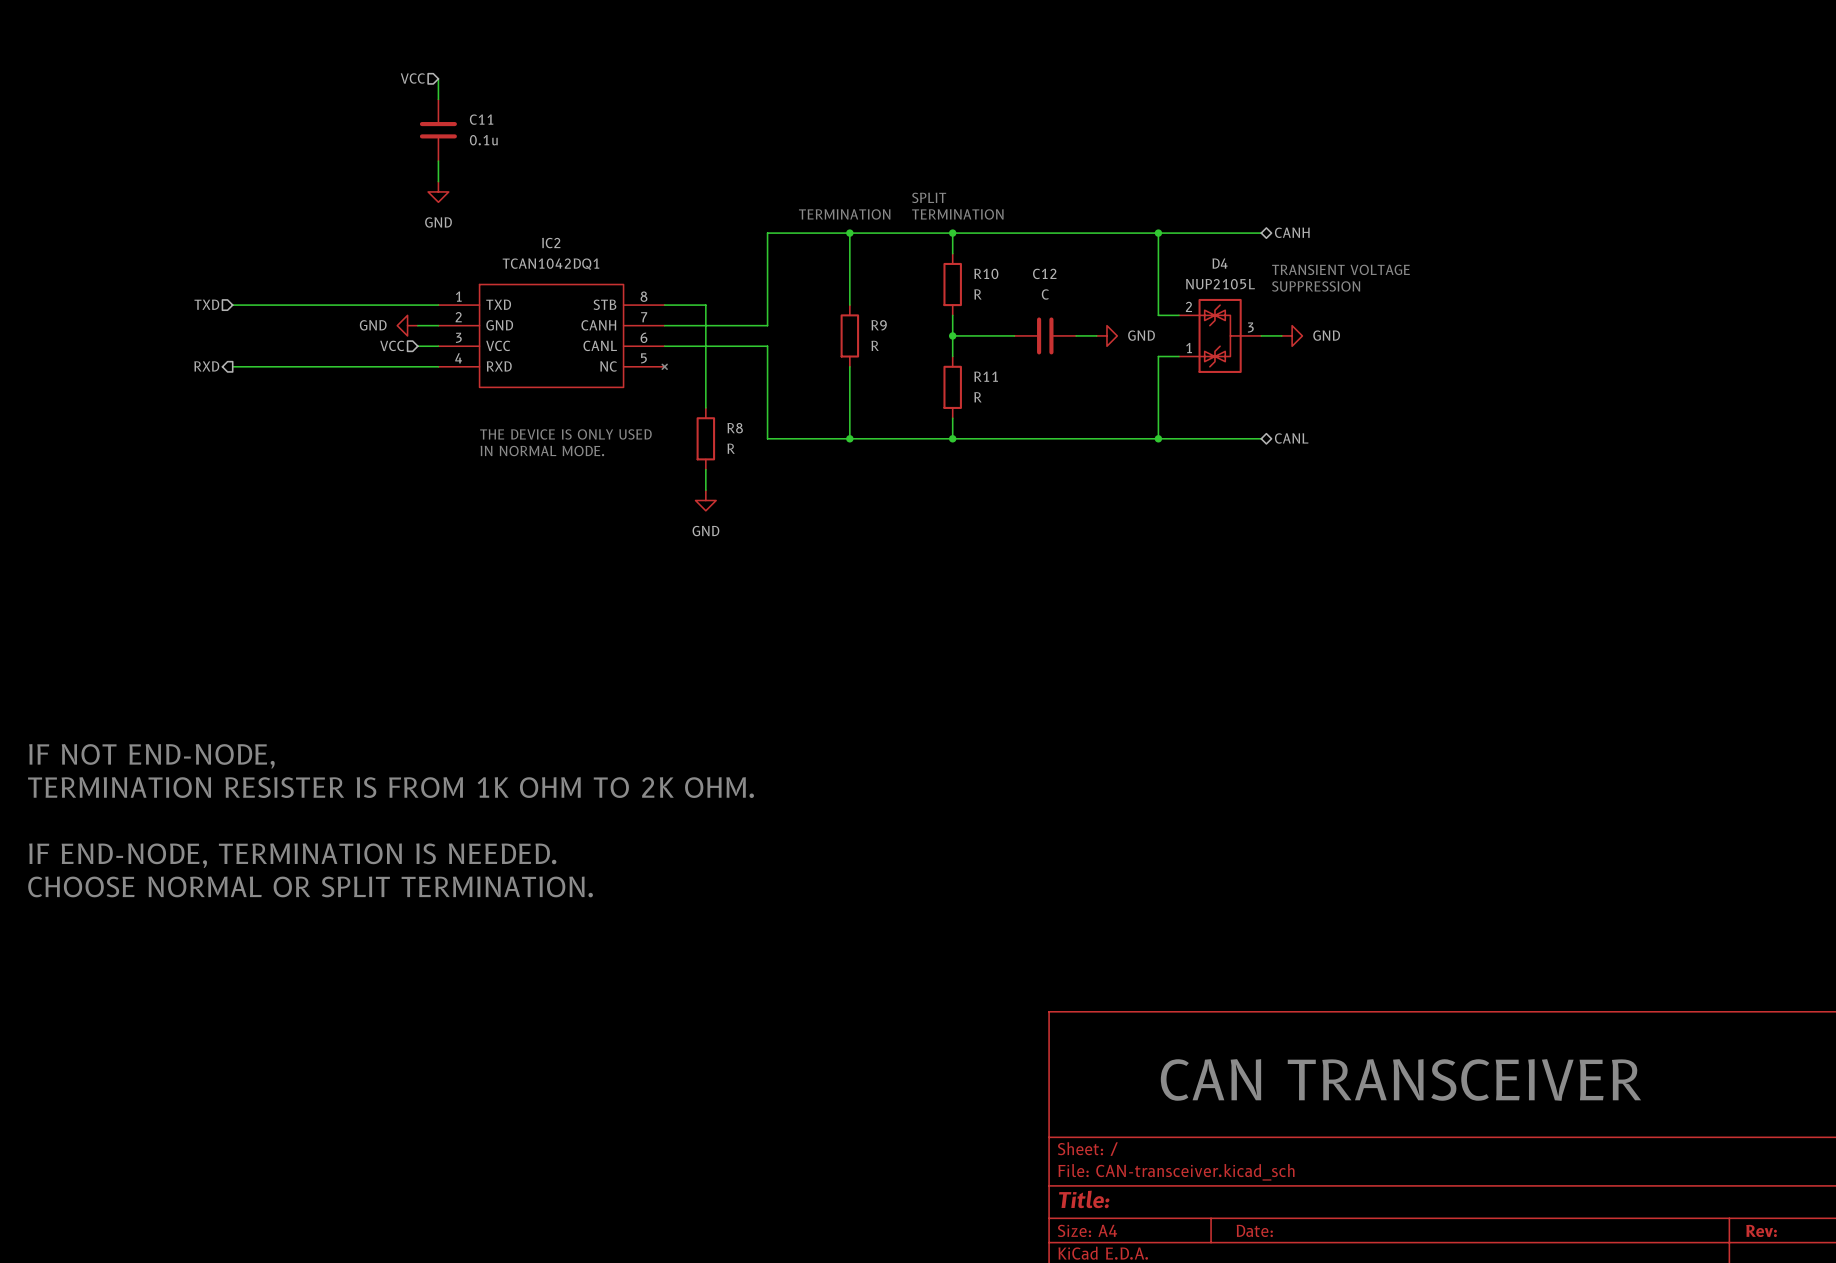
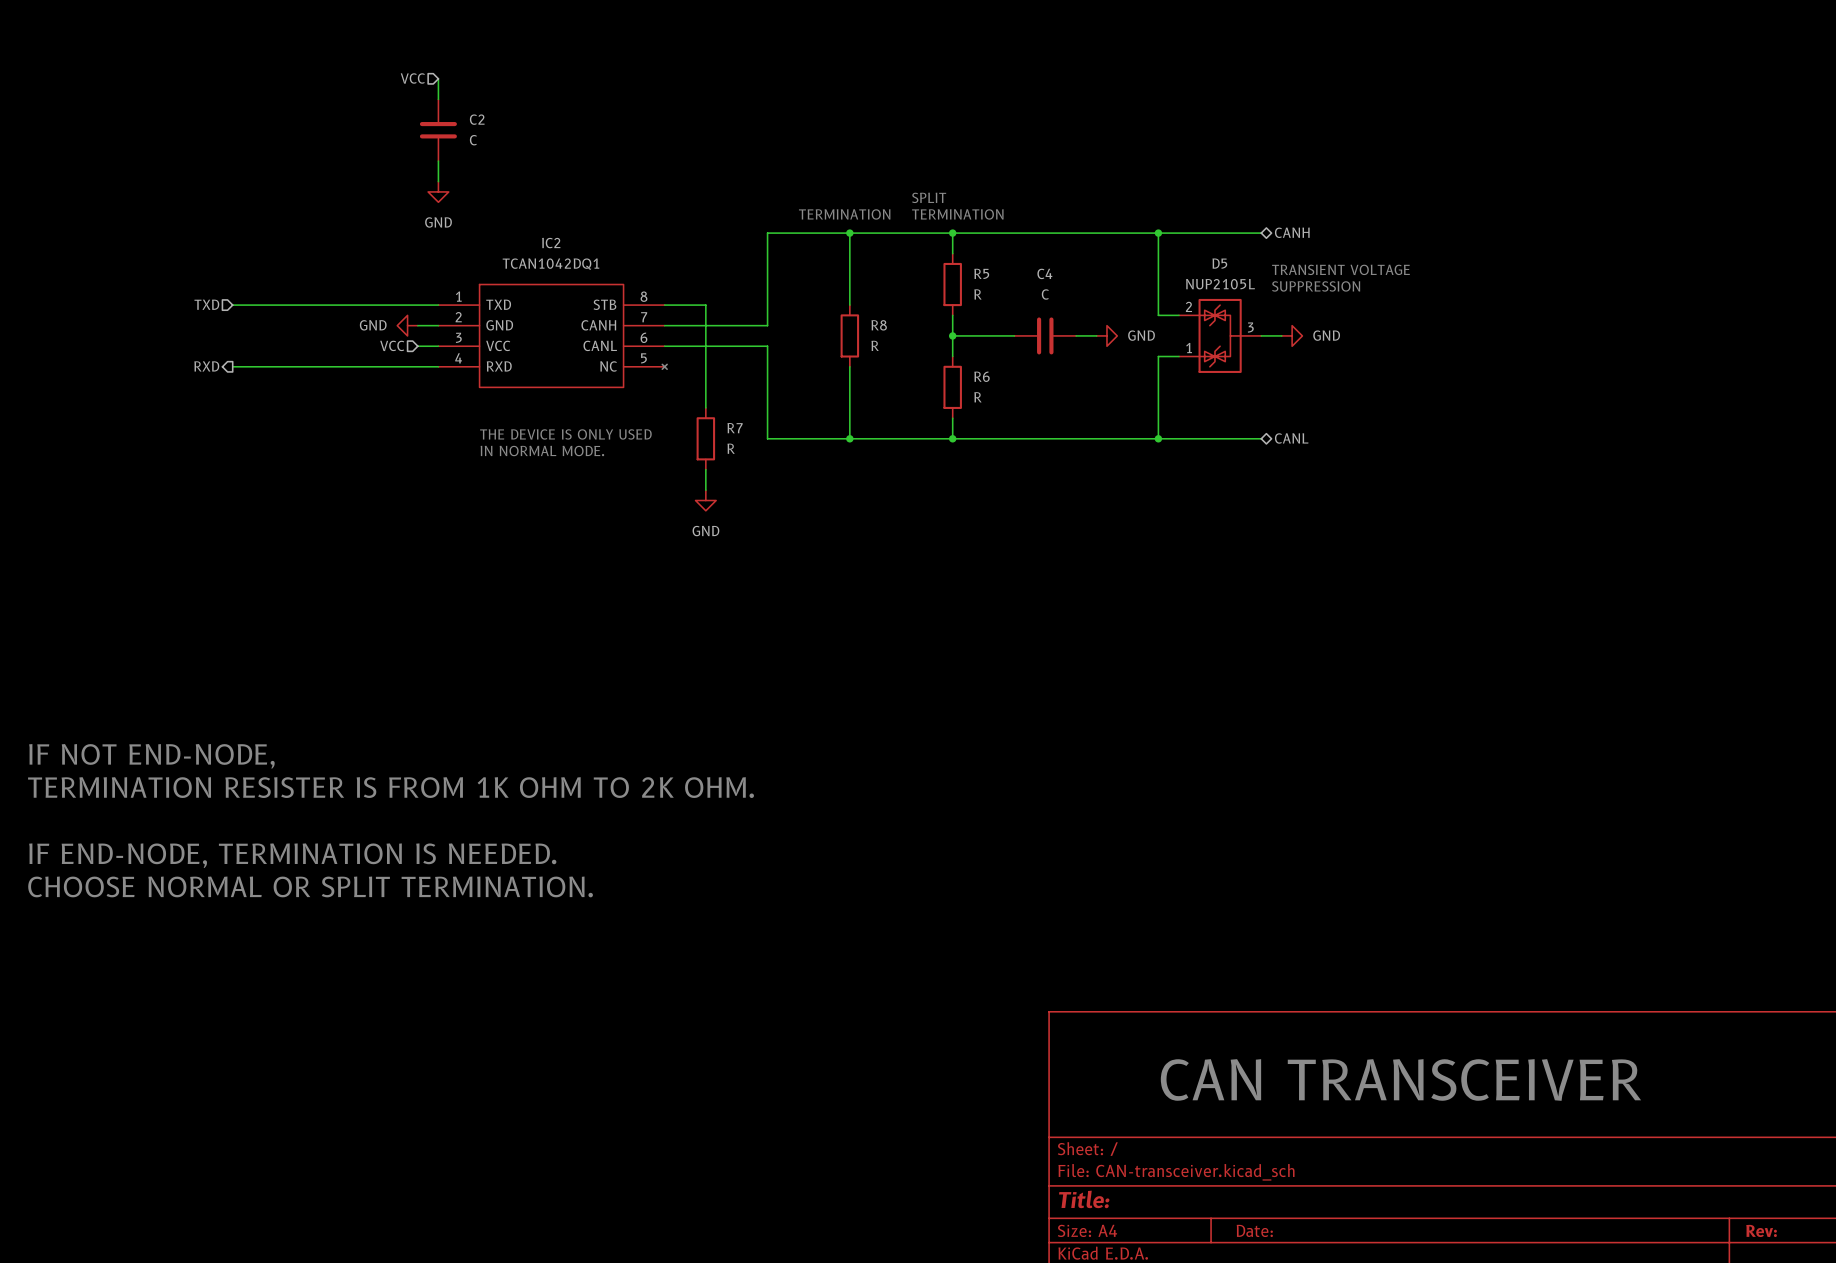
C11 name: C11 (481, 119) -> C2 (477, 119)
C11 value: 0.1u (483, 140) -> C (473, 140)
D4 name: D4 (1220, 263) -> D5 (1219, 263)
R10 name: R10 (986, 273) -> R5 (981, 273)
C12 name: C12 (1044, 273) -> C4 (1044, 273)
R9 name: R9 (879, 325) -> R8 (879, 325)
R11 name: R11 (986, 376) -> R6 (982, 376)
R8 name: R8 (735, 428) -> R7 (735, 428)

